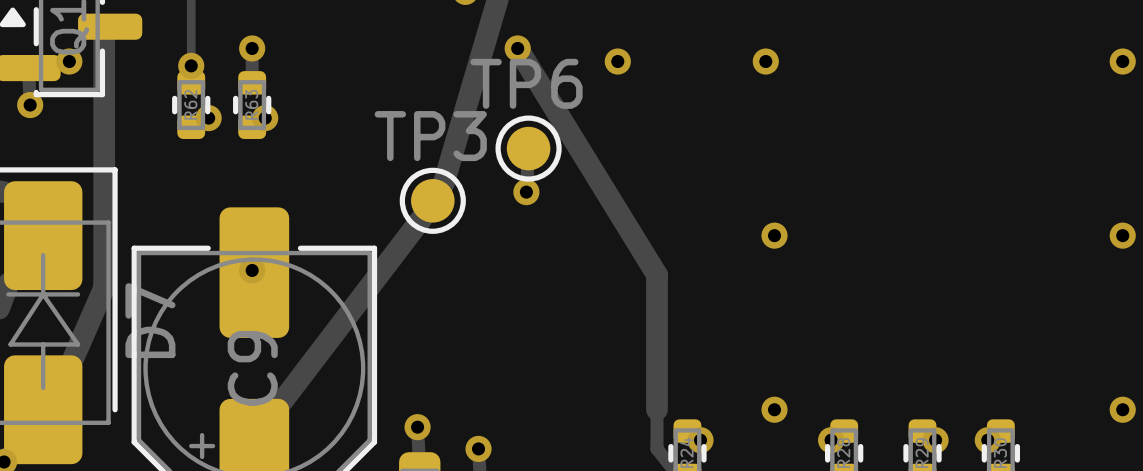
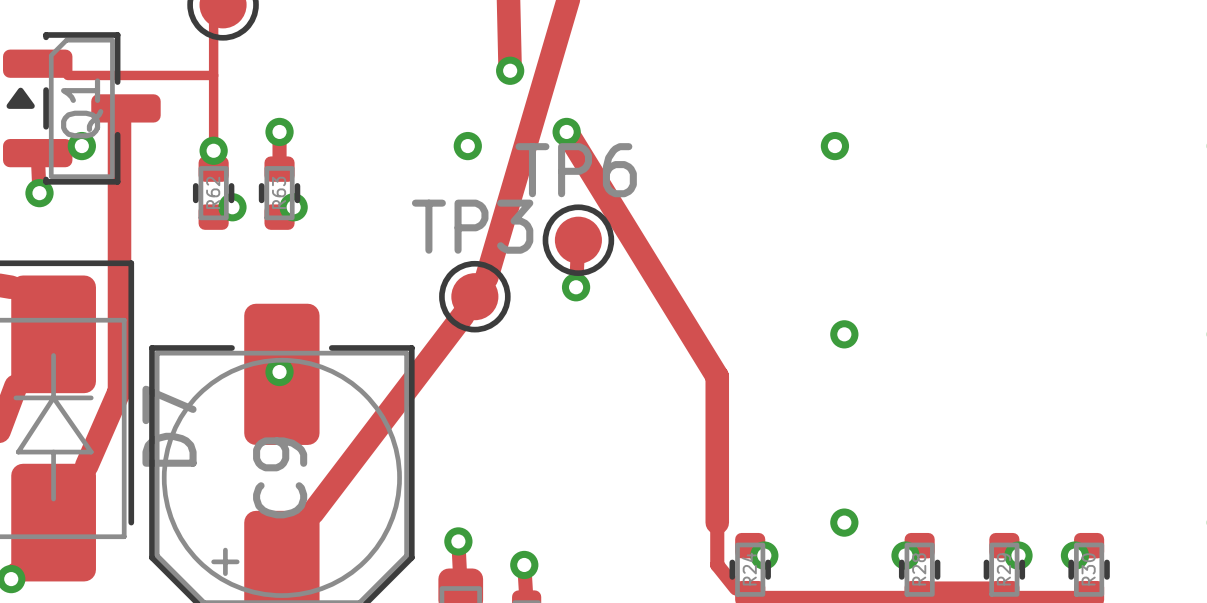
via: none -> (467, 146)
via: (617, 61) -> none

